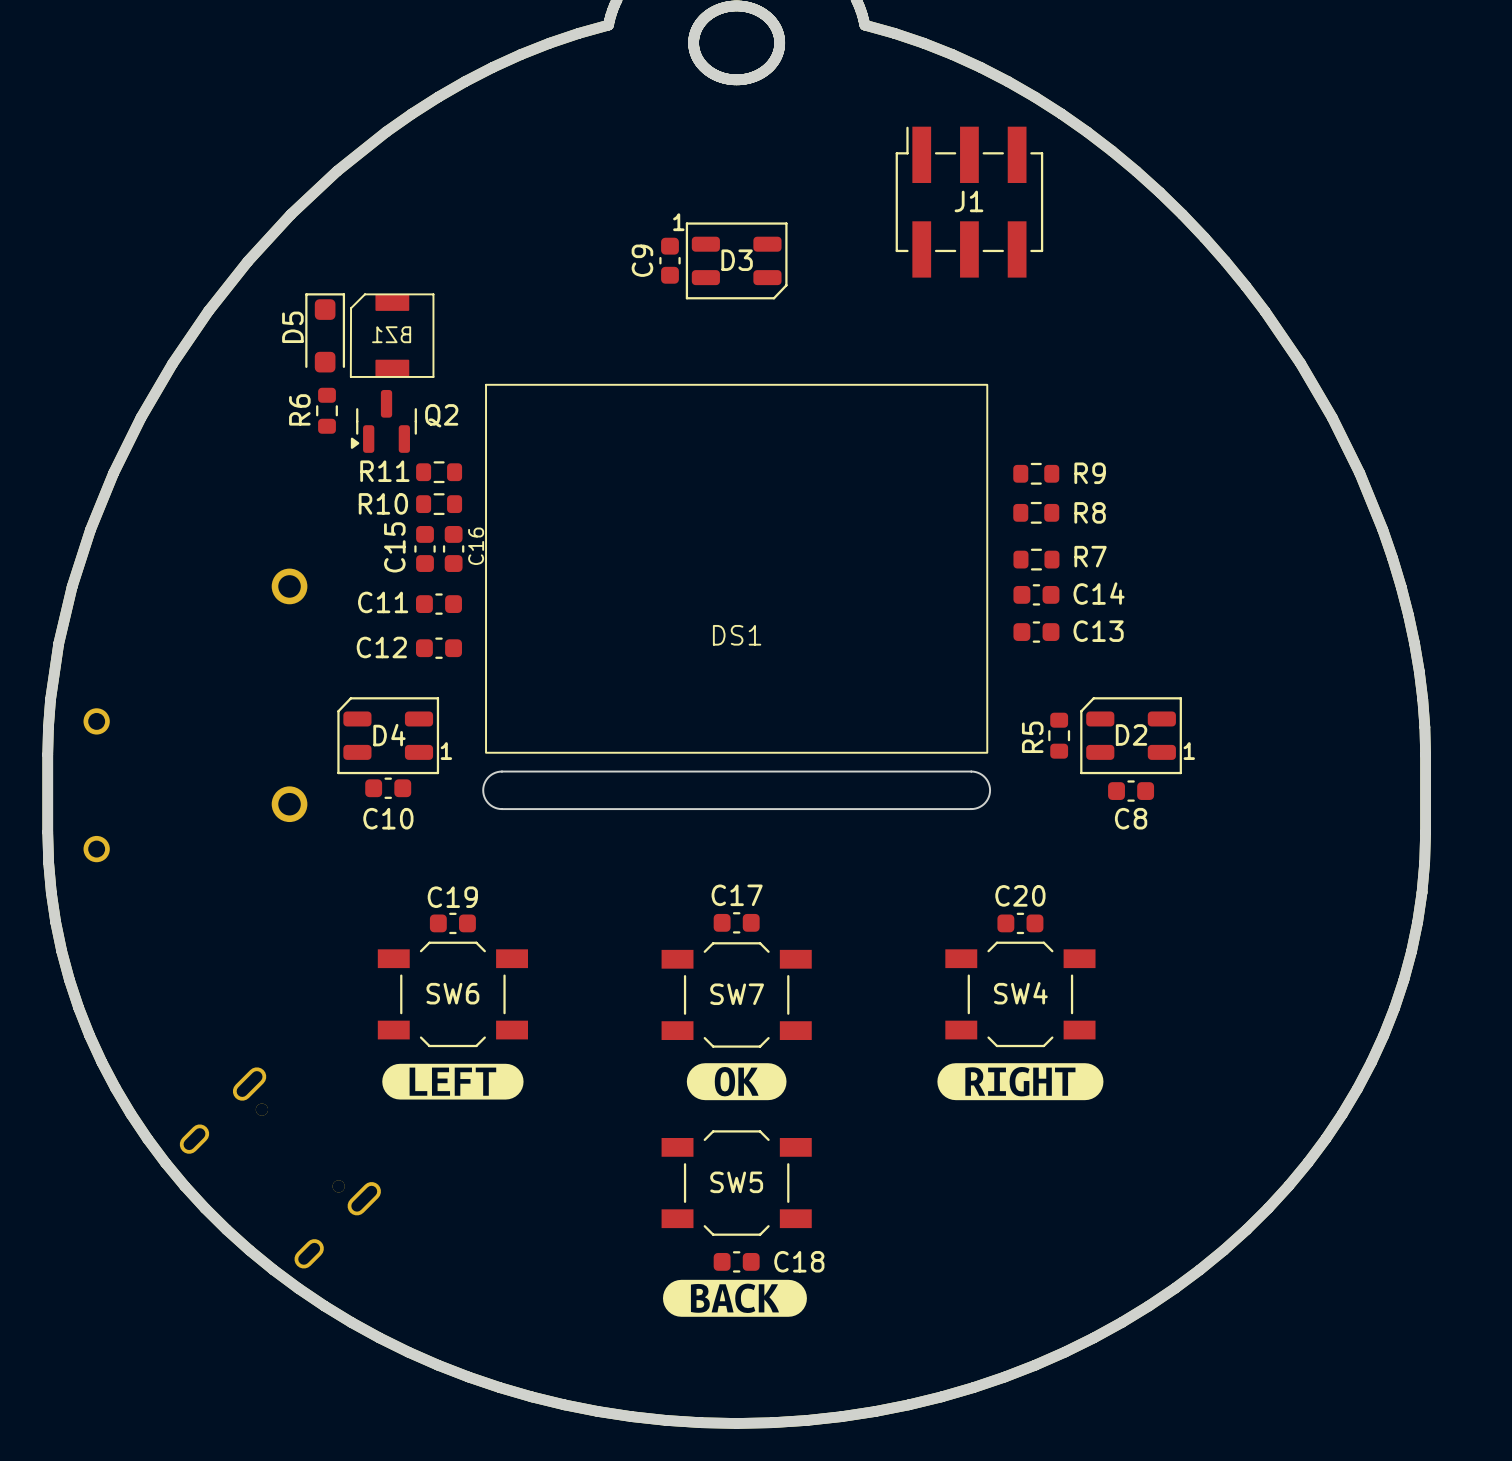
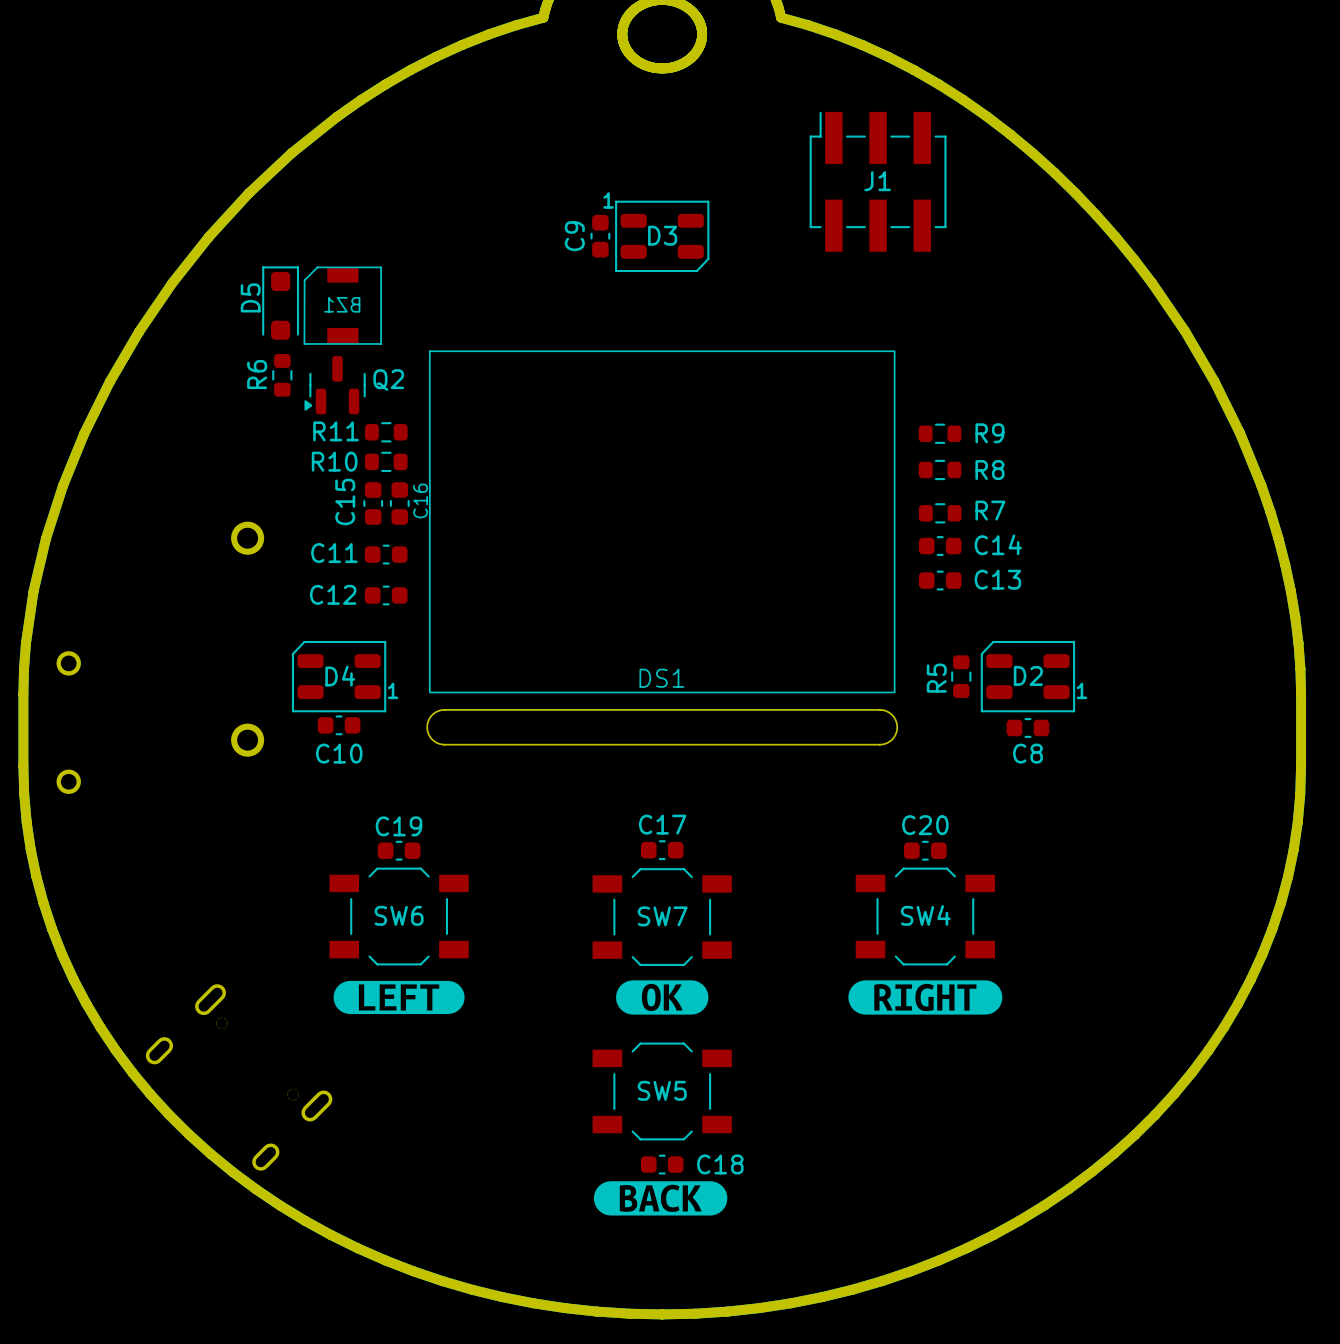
DS1 name position: DS1 (737, 635) -> DS1 (661, 678)

